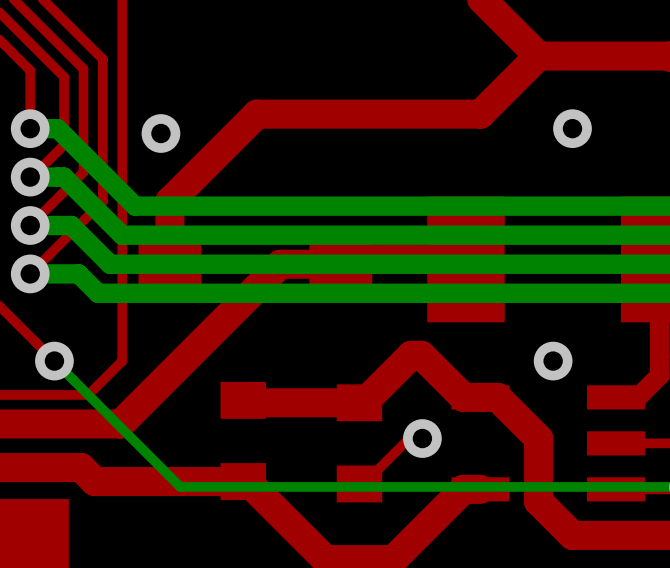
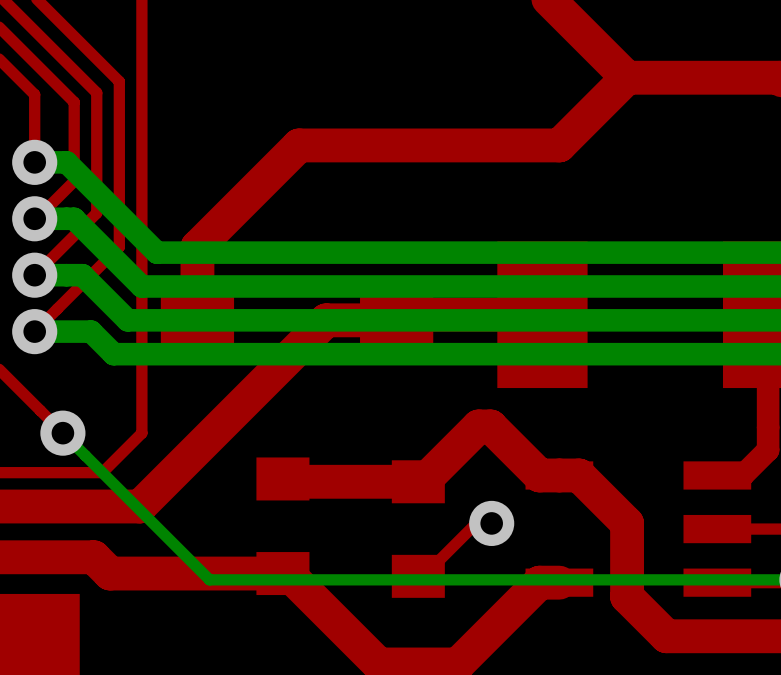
via: (572, 128) -> none
via: (160, 133) -> none
via: (553, 361) -> none

